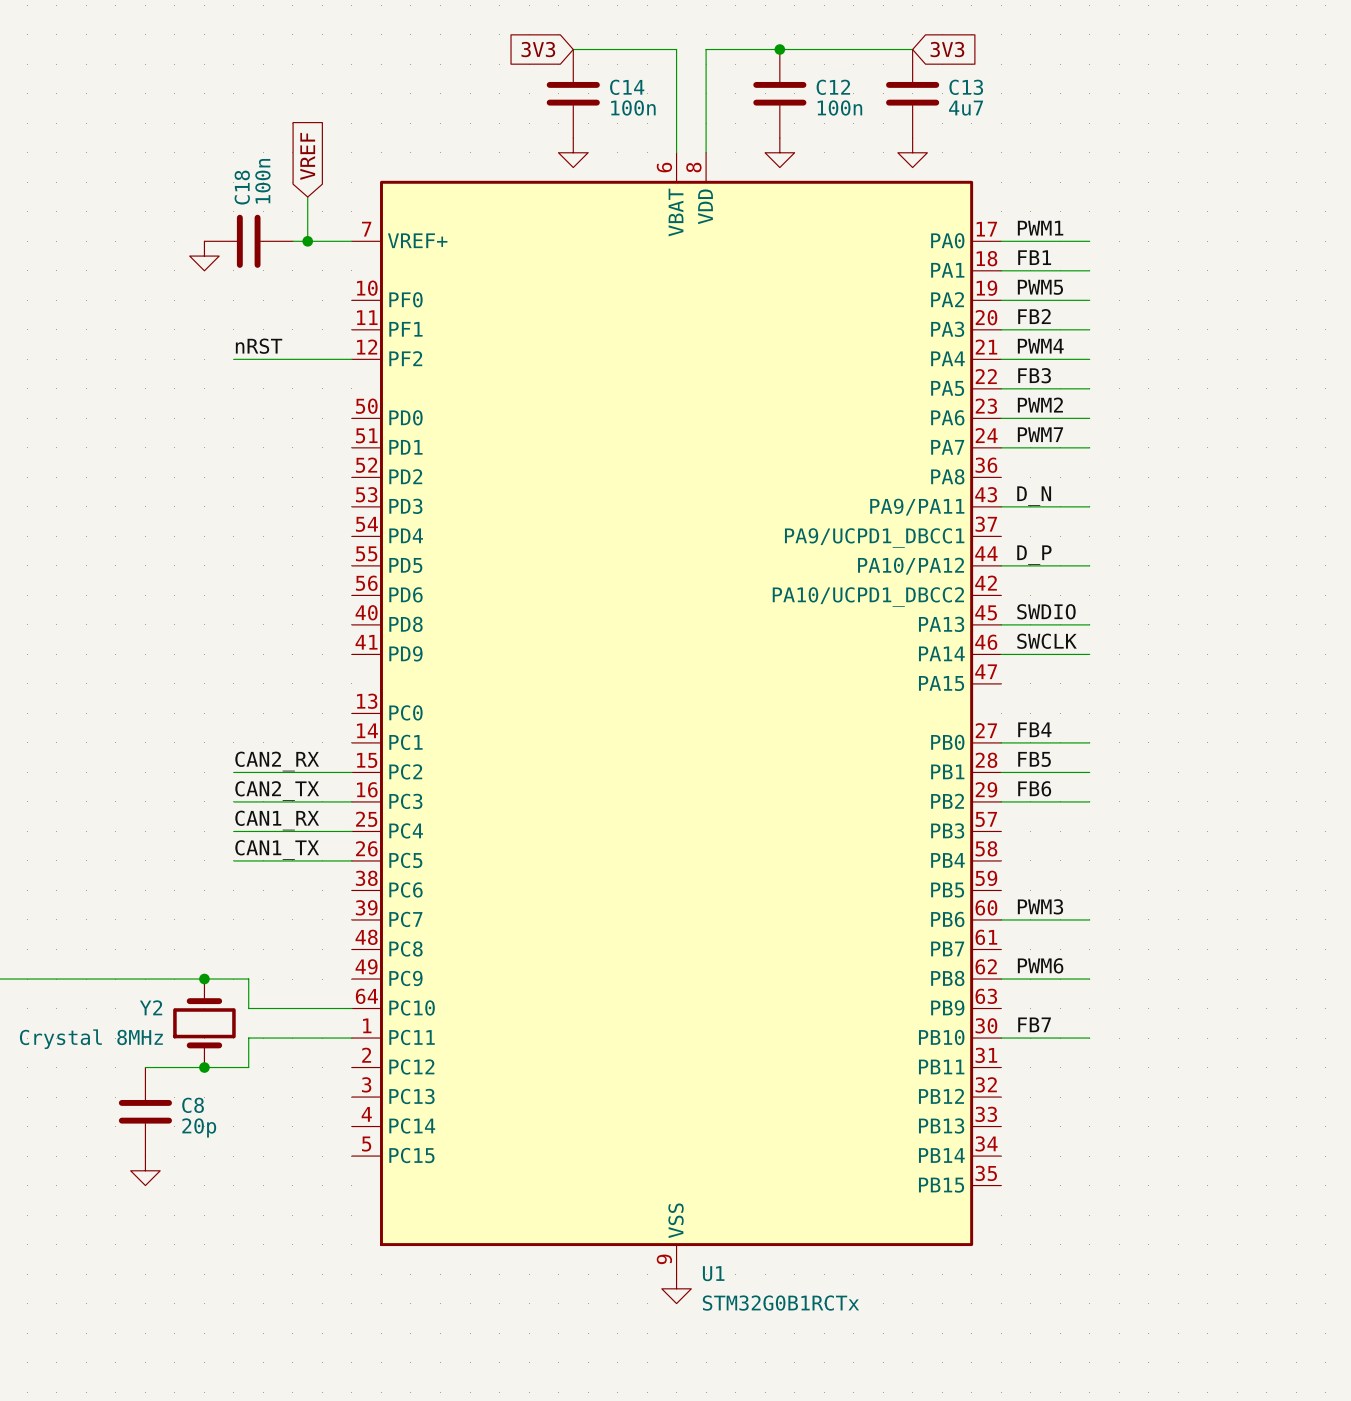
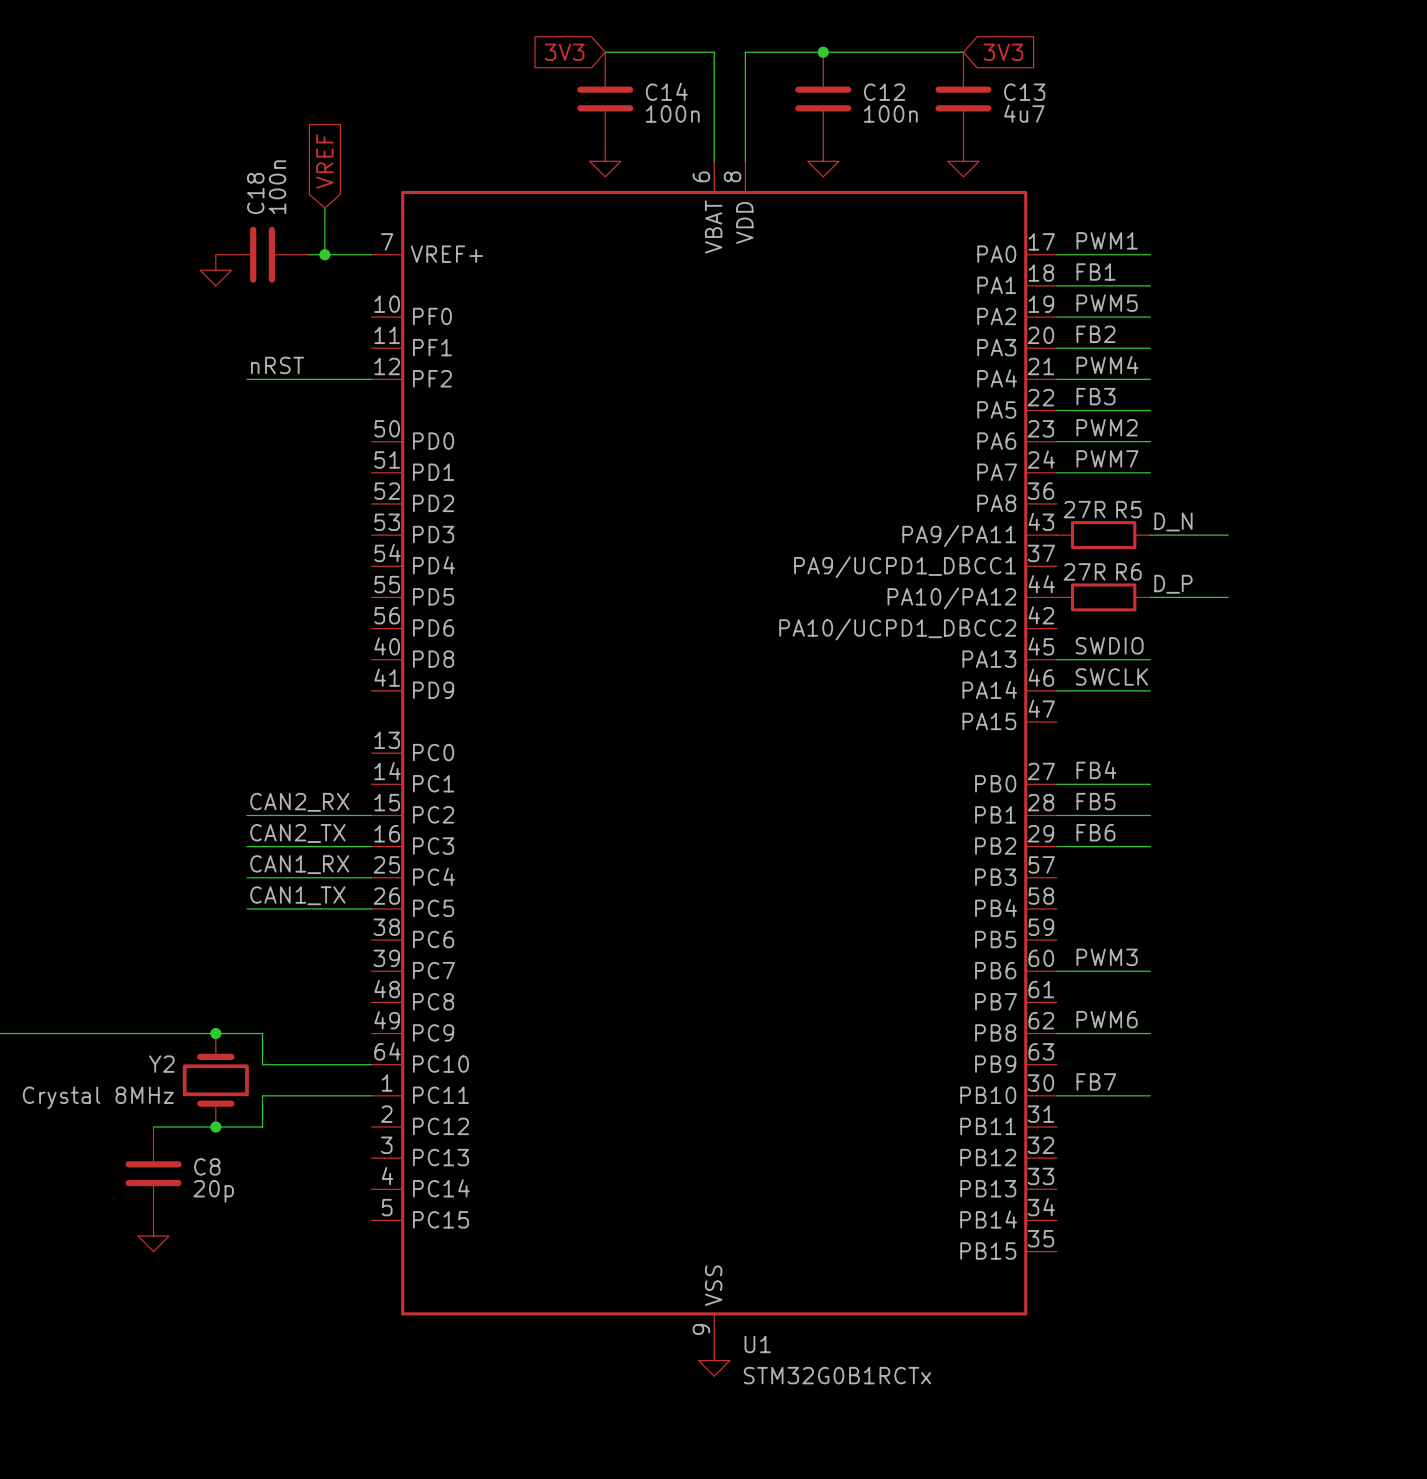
label position: D_N (1034, 496) -> D_N (1173, 521)
wire: (1001, 506) (1089, 506) -> (1228, 535) (1150, 535)
R5: none -> 27R (1103, 535)
label position: D_P (1034, 555) -> D_P (1173, 584)
wire: (1001, 565) (1089, 565) -> (1228, 597) (1150, 597)
R6: none -> 27R (1103, 597)

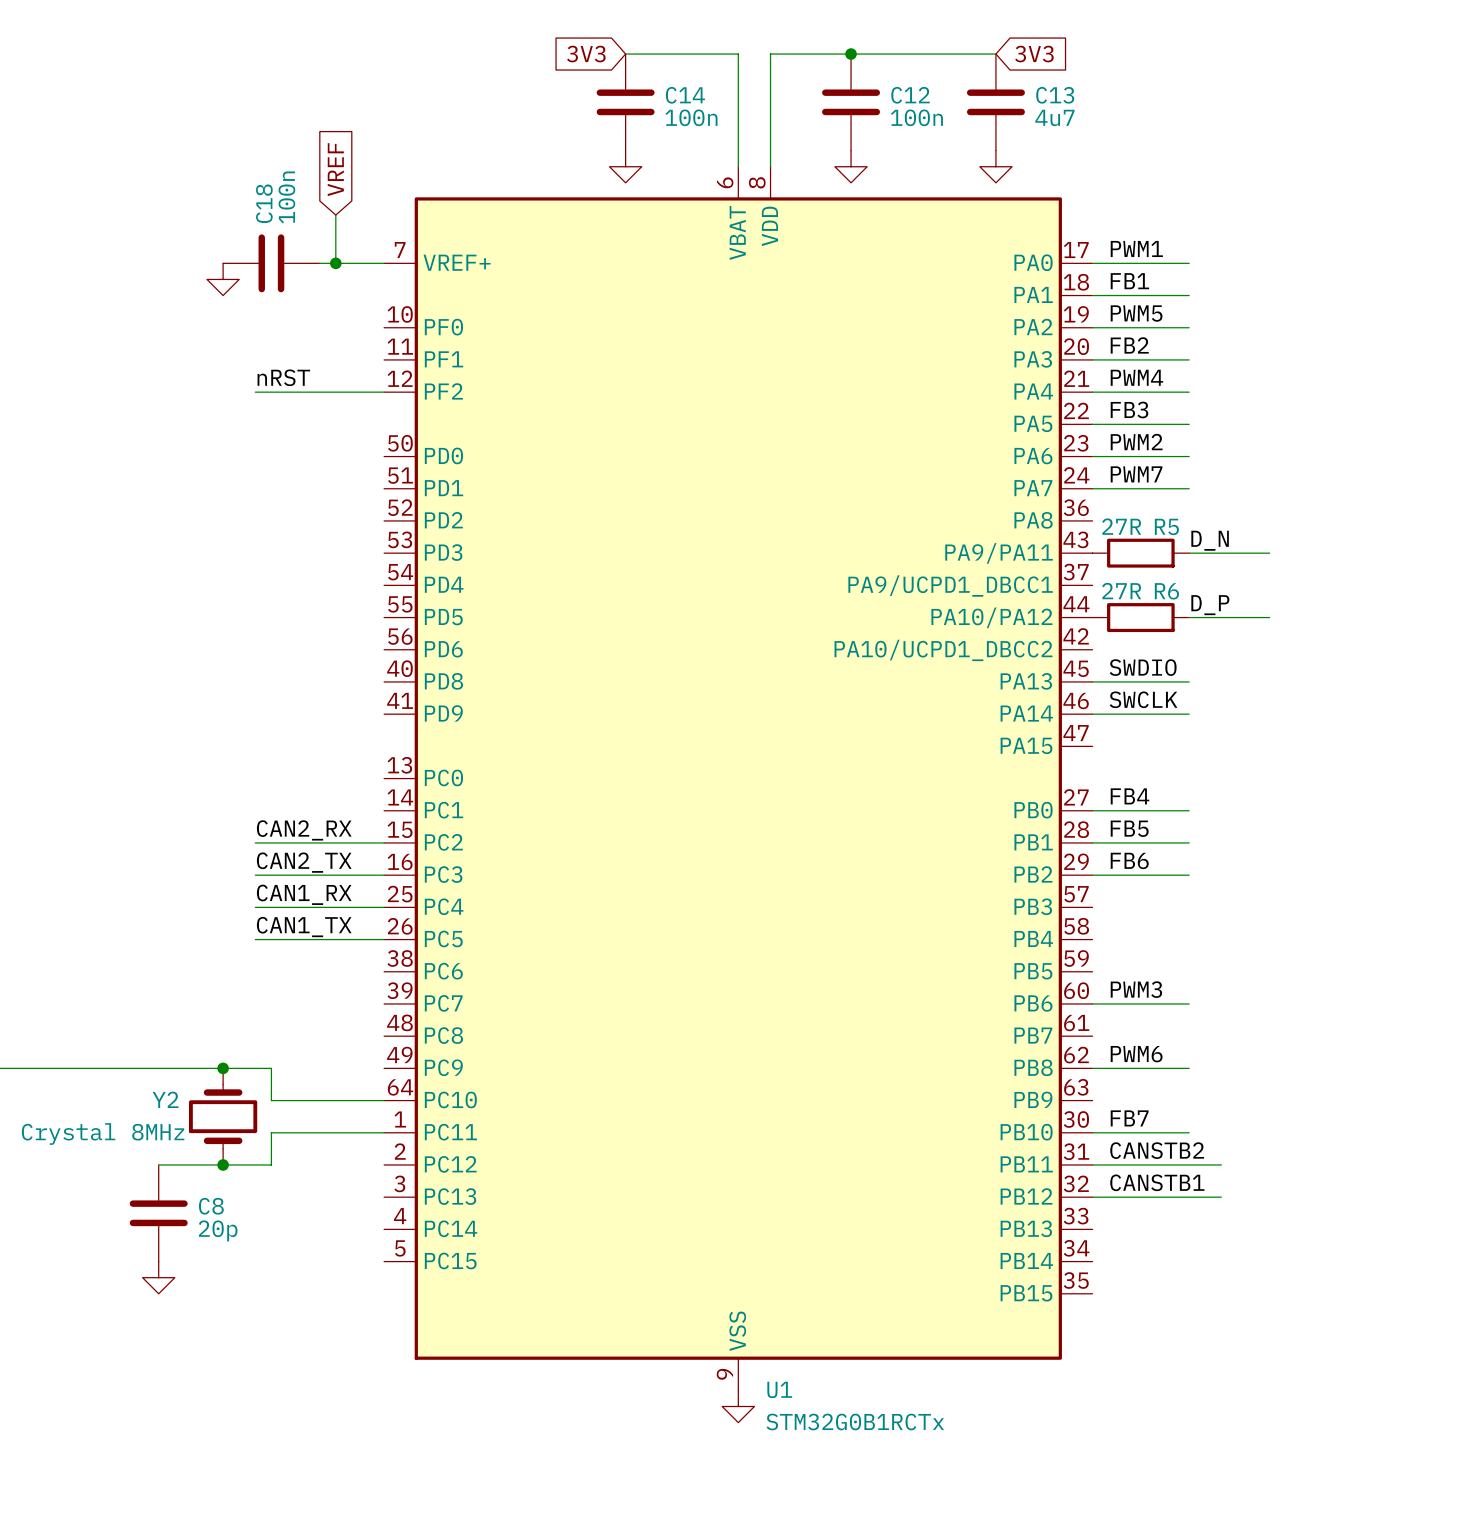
label: none -> CANSTB2 (1157, 1150)
wire: none -> (1092, 1164) (1221, 1164)
label: none -> CANSTB1 (1157, 1182)
wire: none -> (1092, 1197) (1221, 1197)

